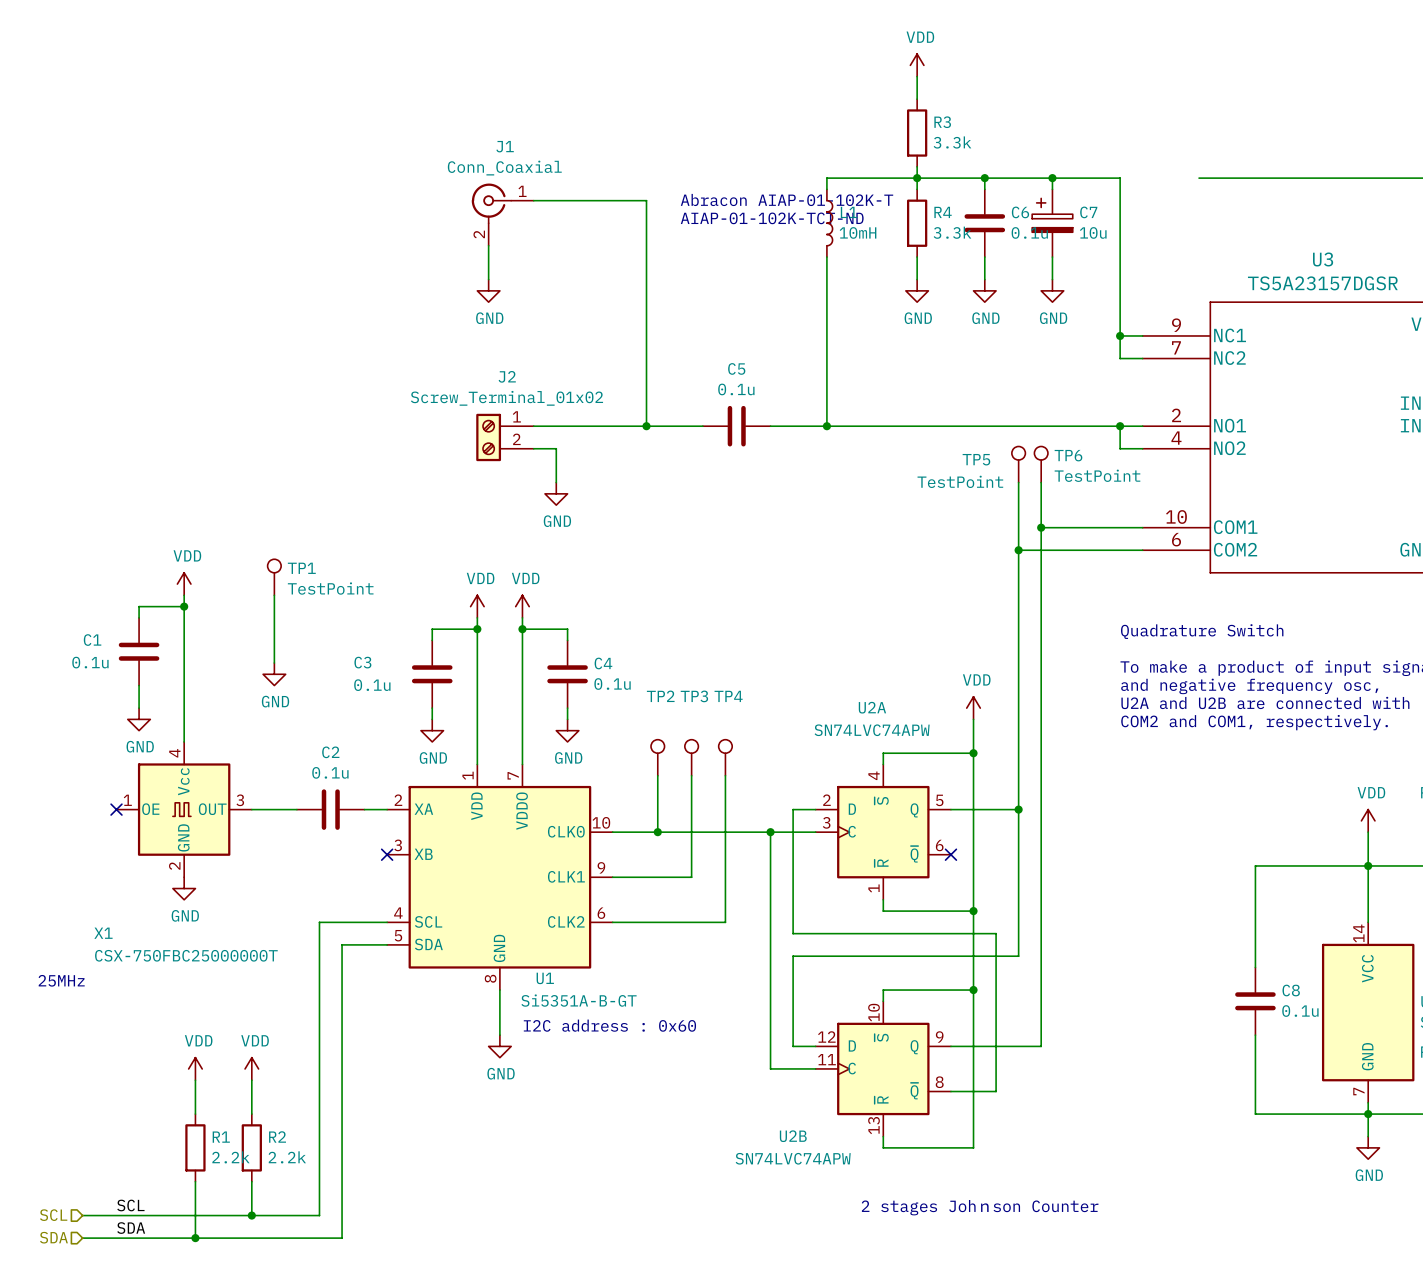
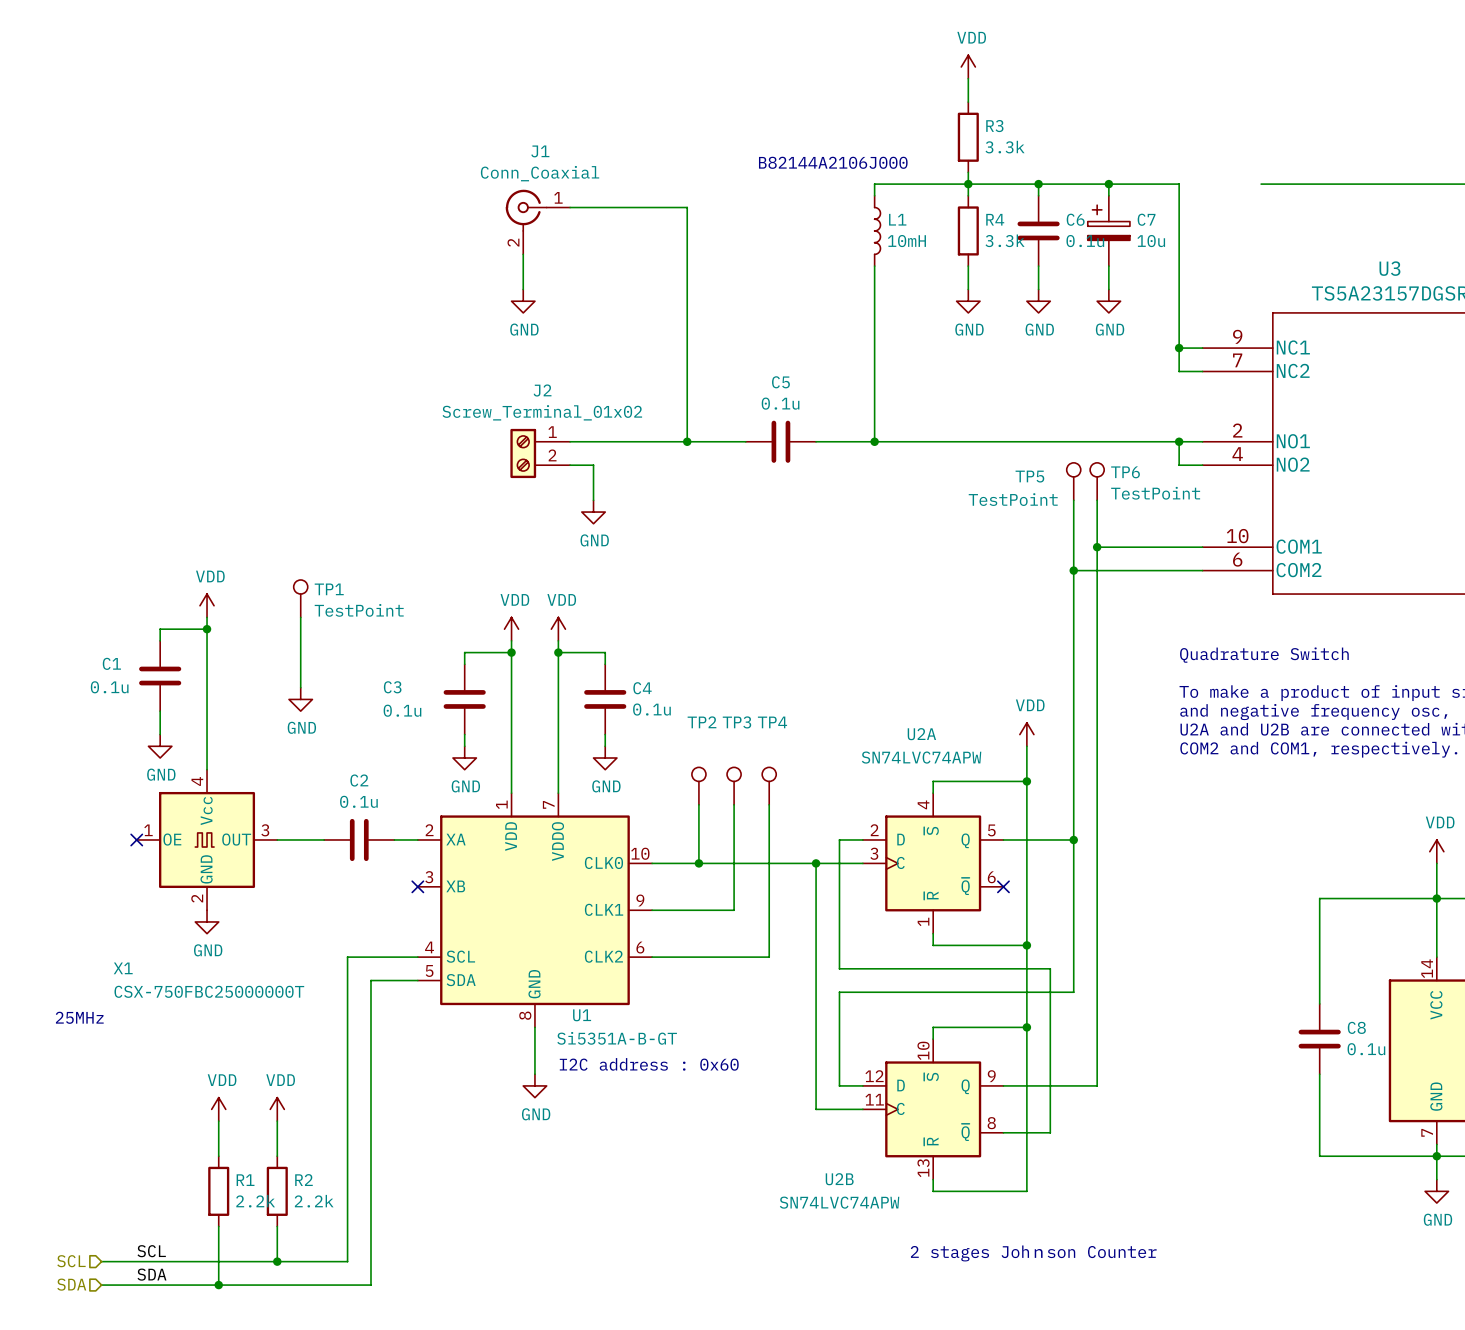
text: none -> B82144A2106J000 (833, 162)
text: Abracon AIAP-01-102K-T (787, 199) -> none
text: AIAP-01-102K-TCT-ND (772, 218) -> none

